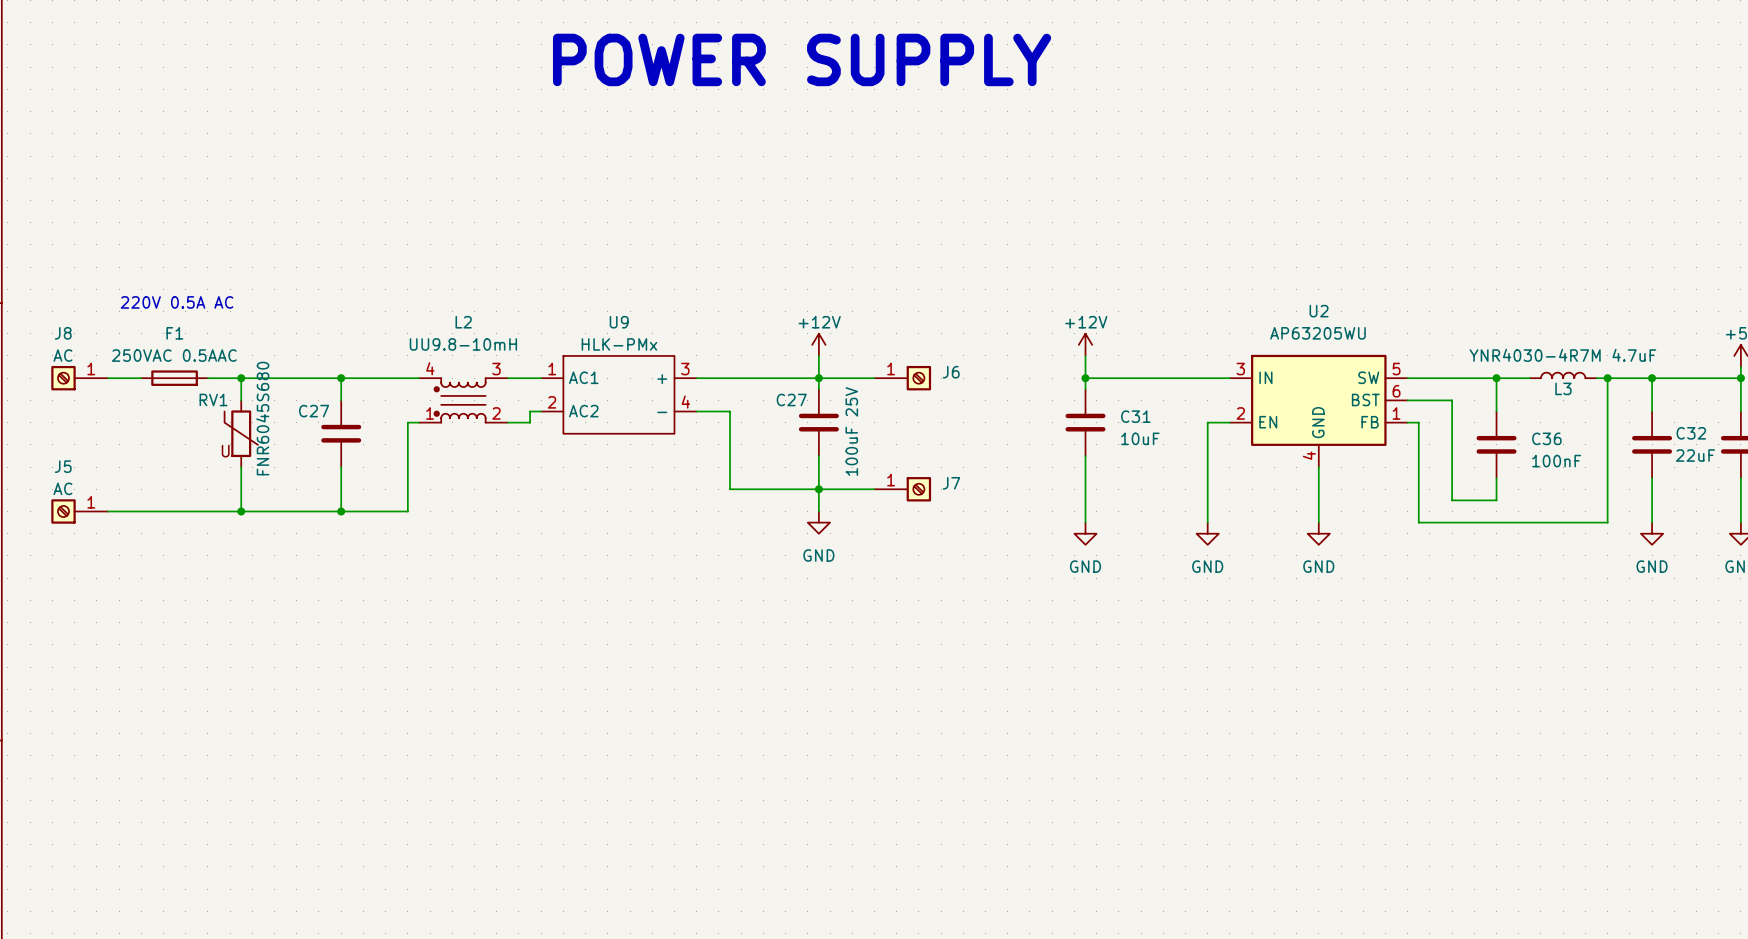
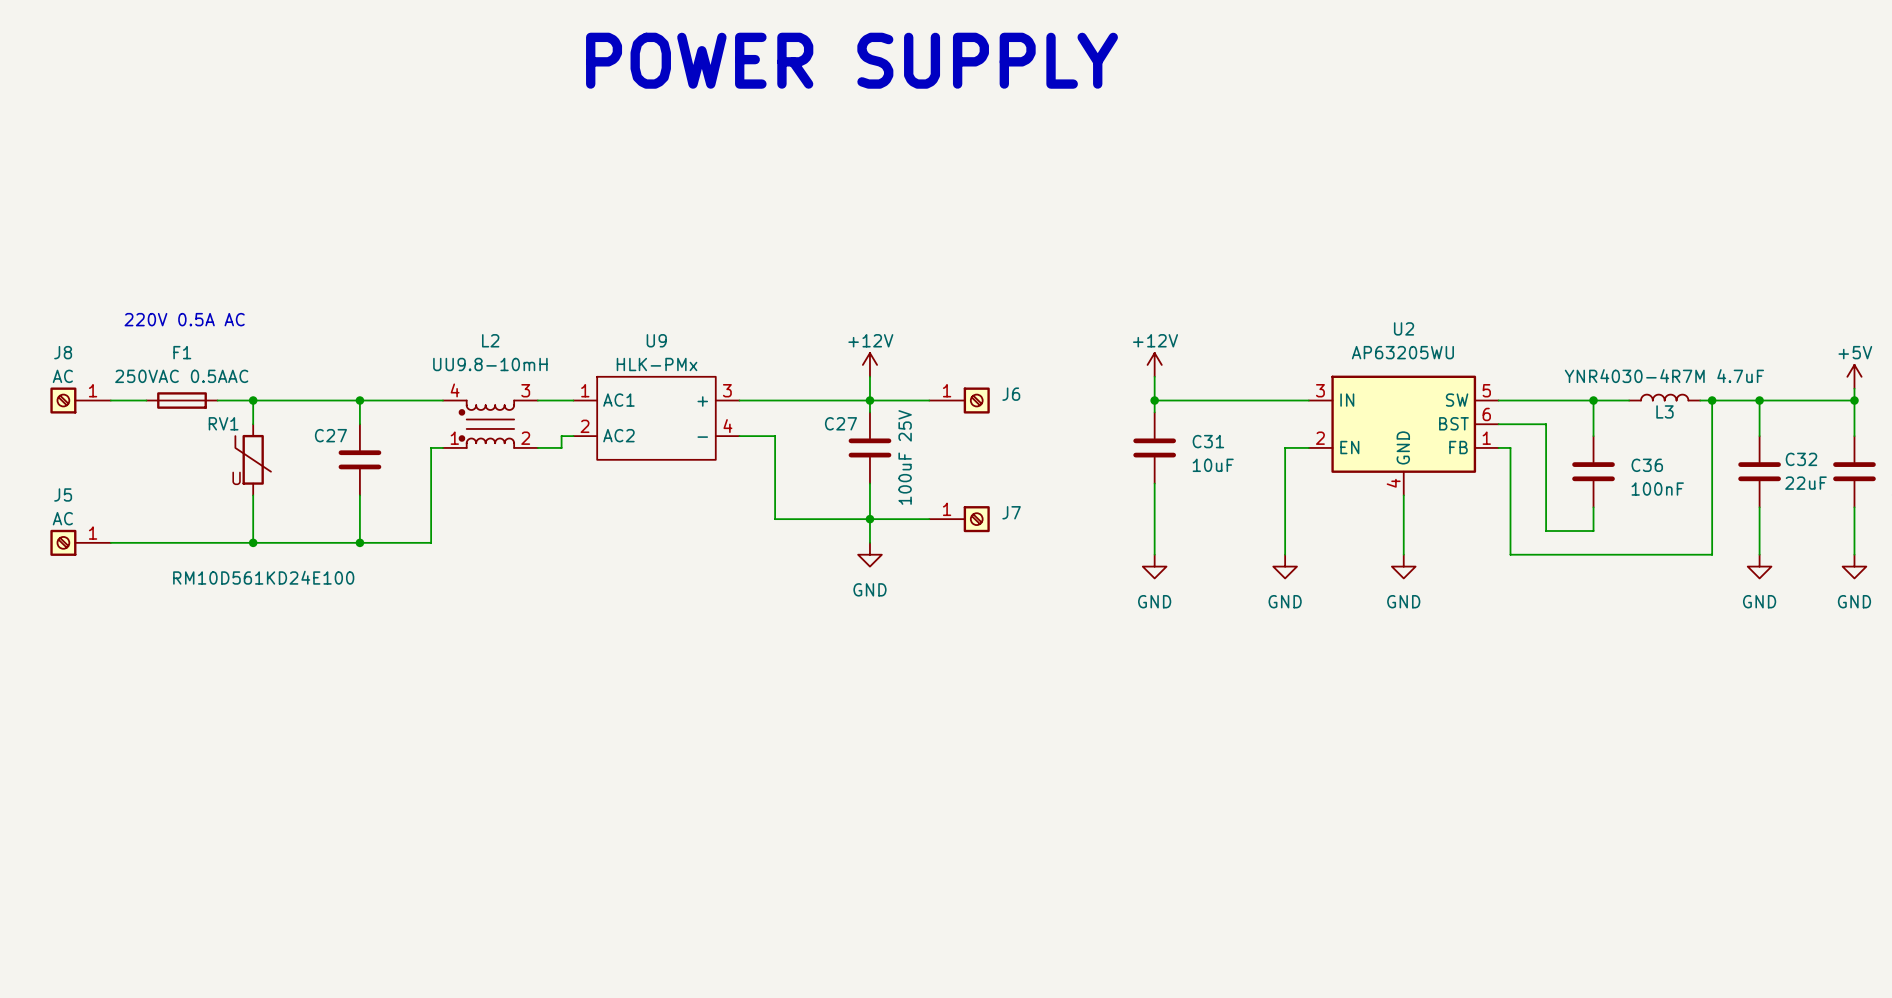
RV1 value: FNR6045S680 (262, 418) -> RM10D561KD24E100 (263, 577)

